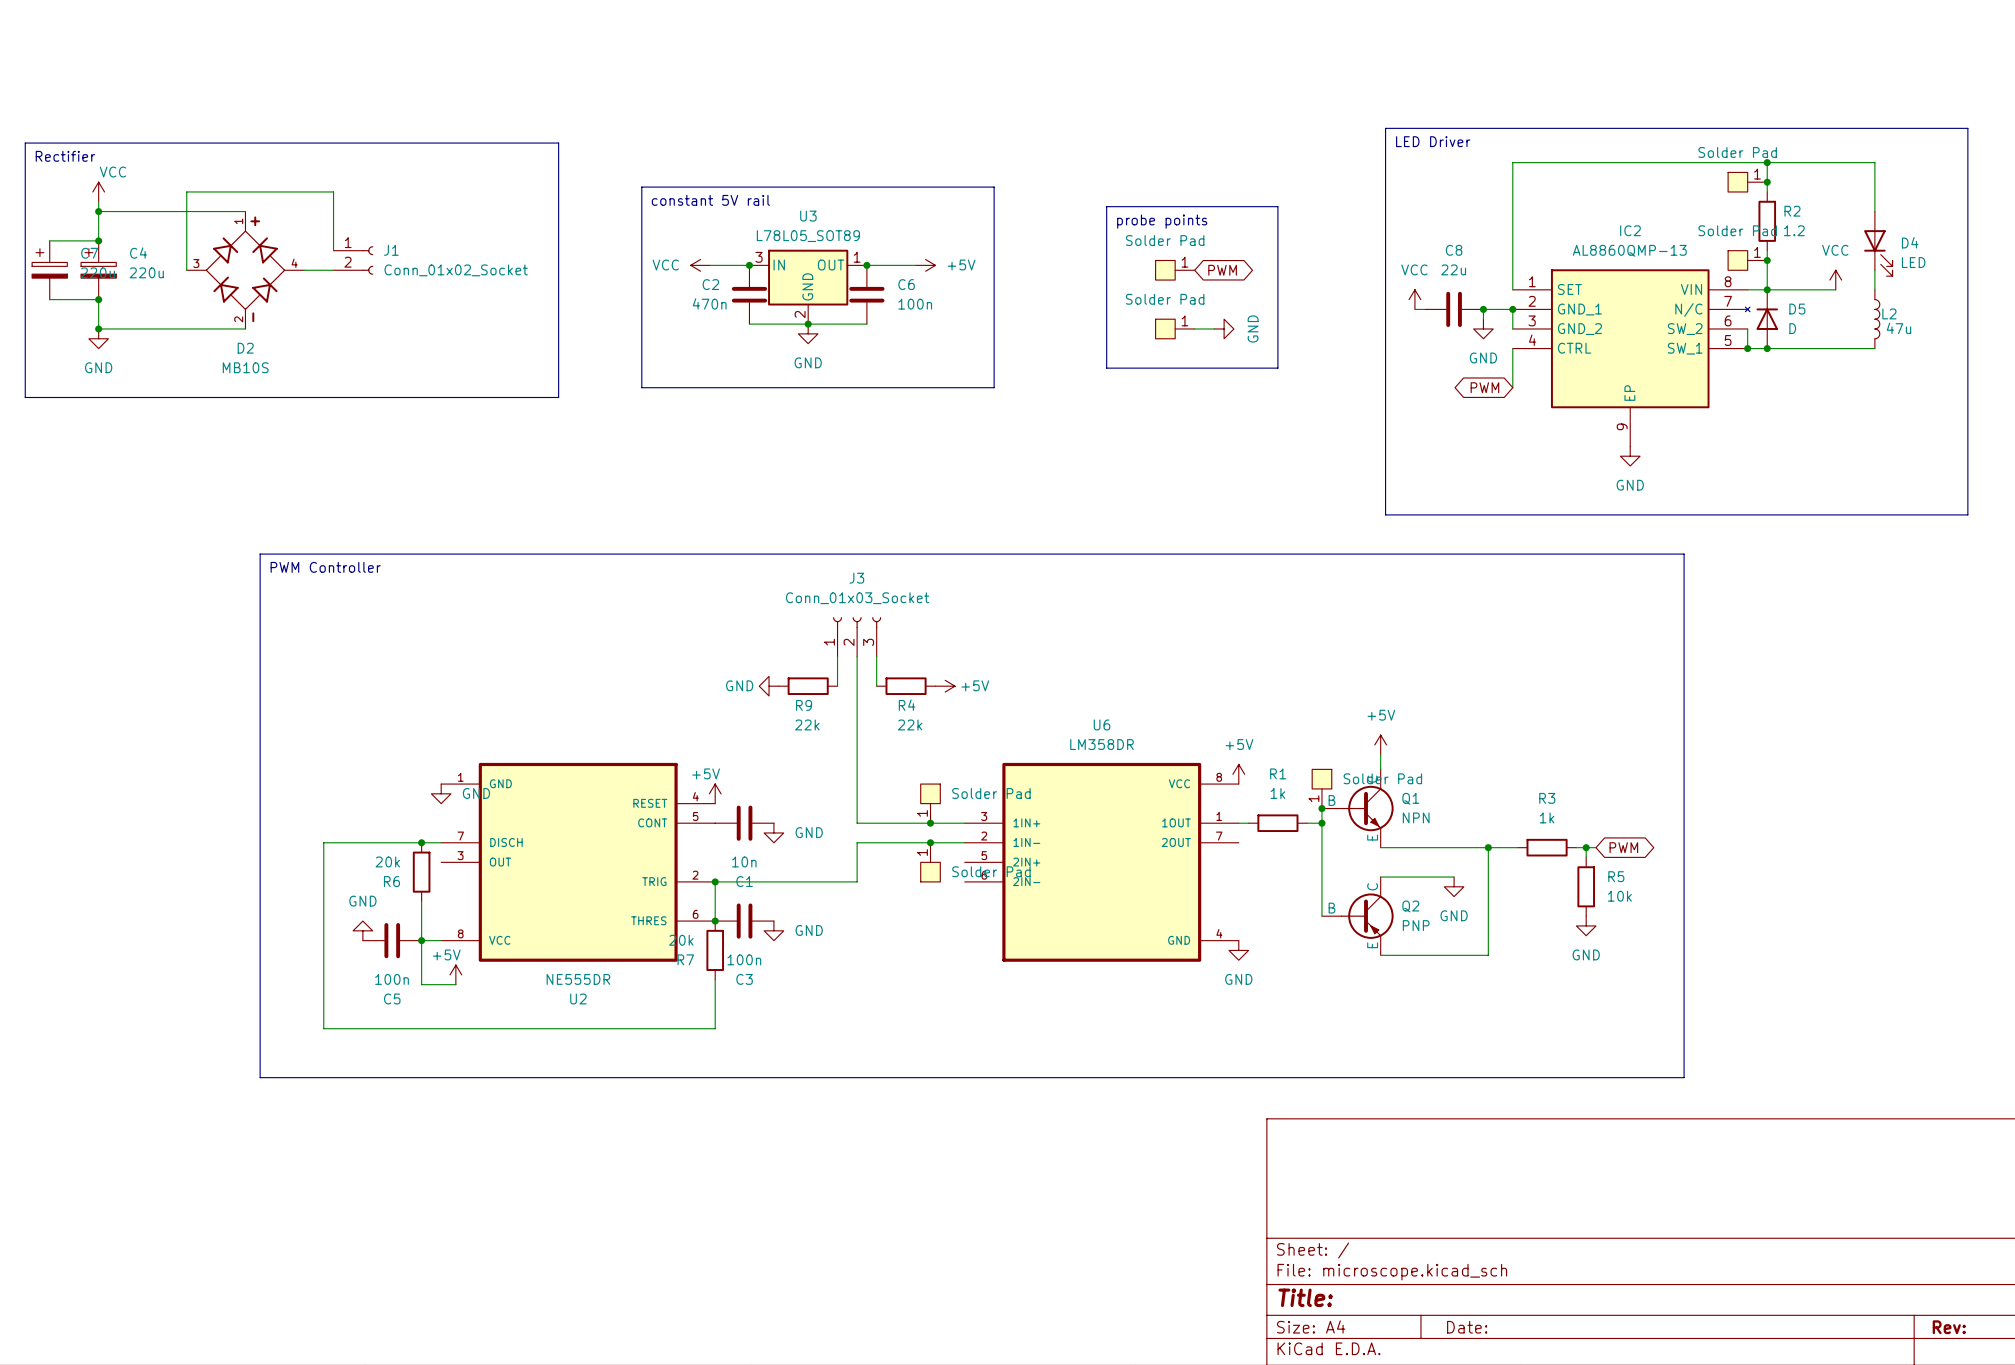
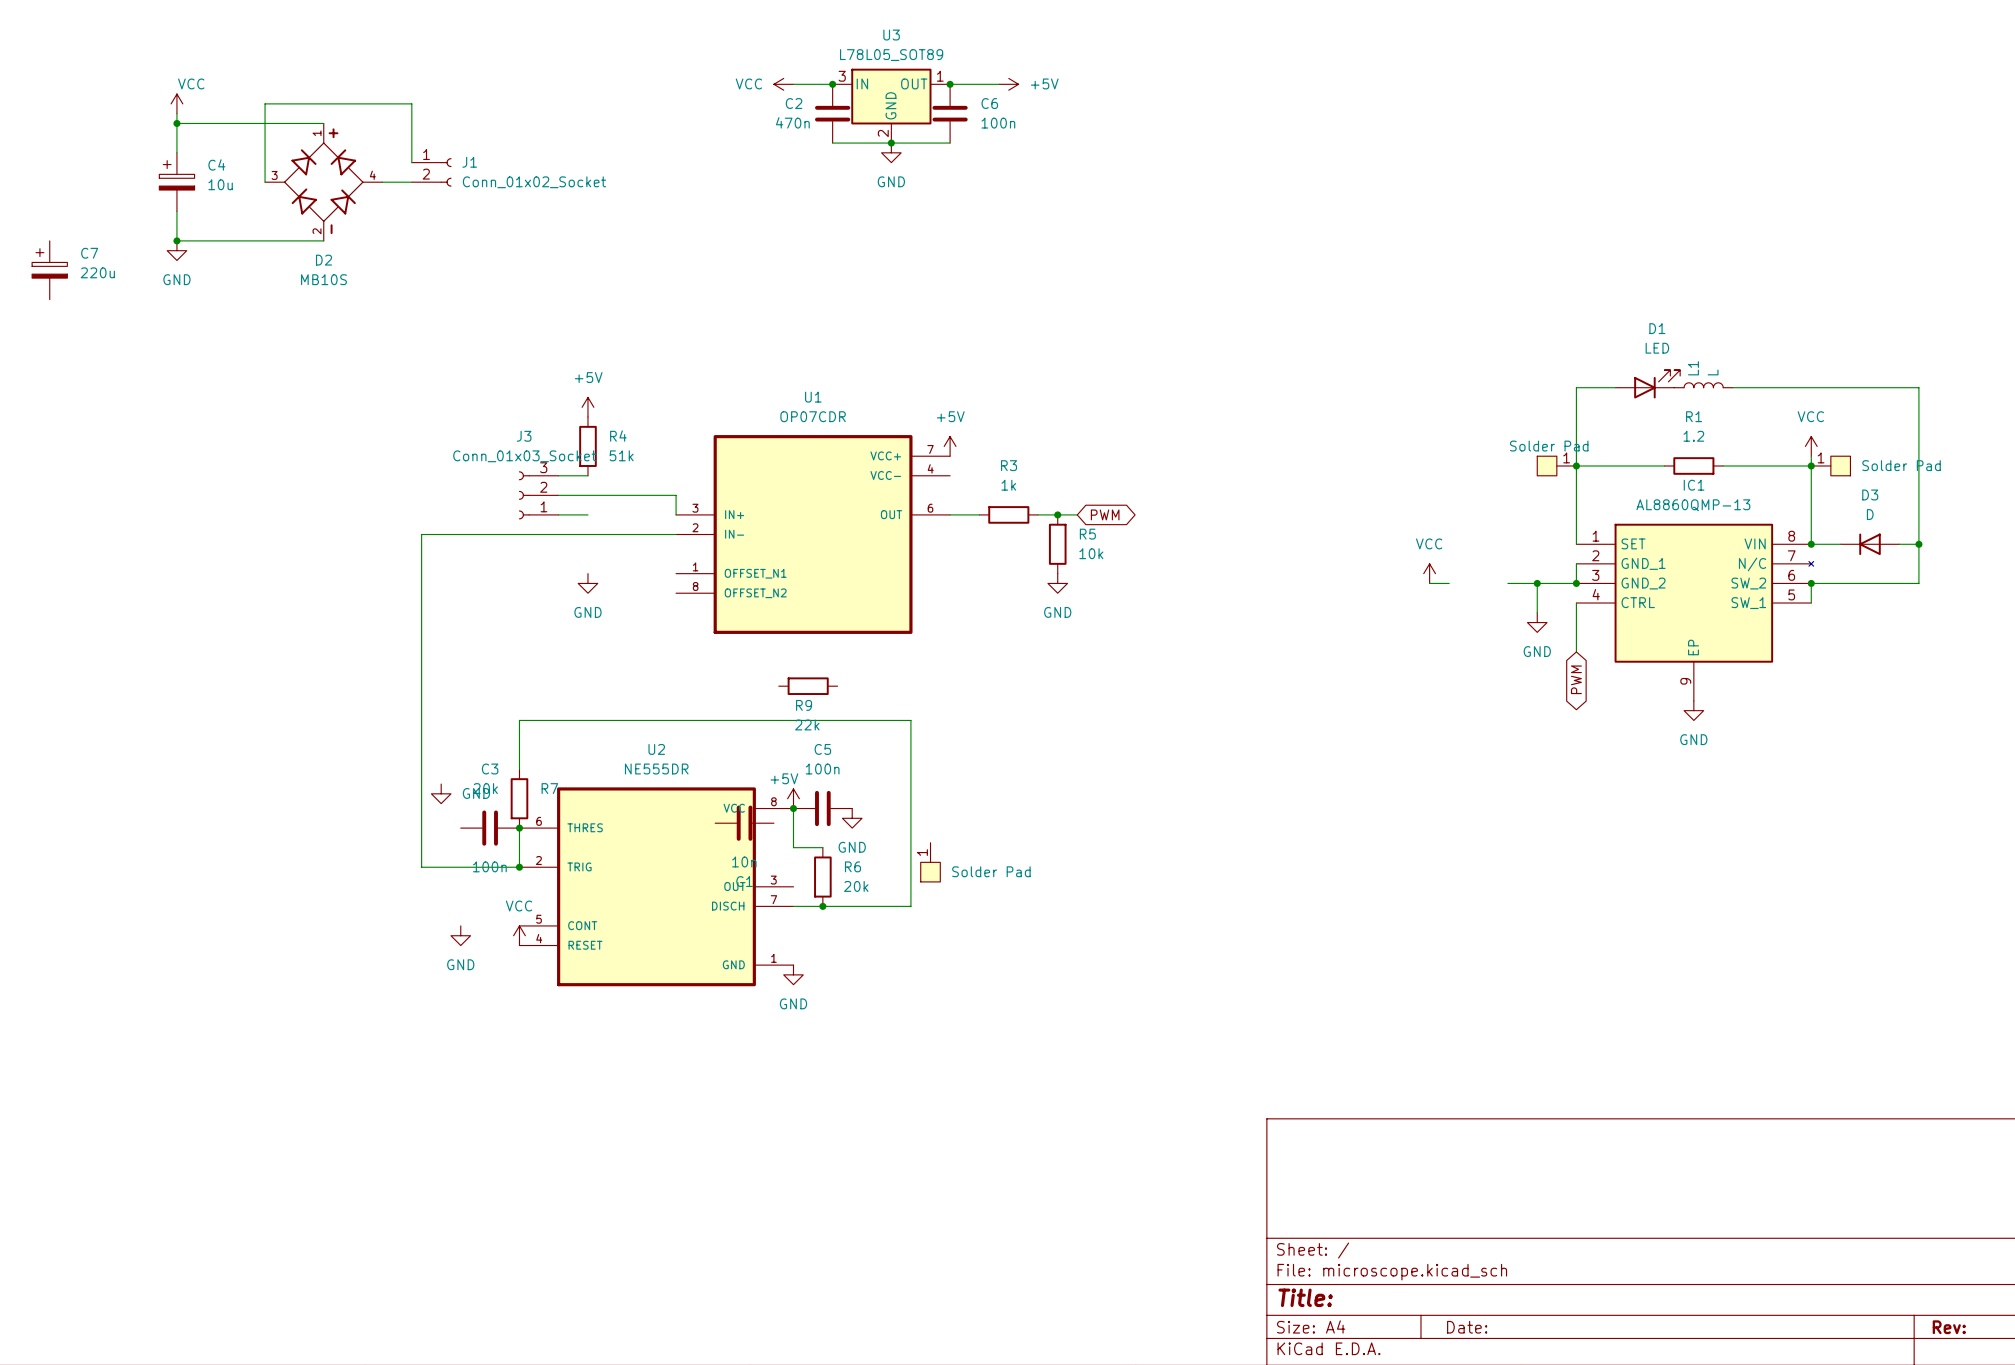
power symbol: none -> VCC (783, 84)
wire: none -> (793, 84) (832, 84)
junction: none -> (832, 84)
wire: none -> (950, 84) (999, 84)
junction: none -> (950, 84)
power symbol: none -> +5V (1008, 84)
wire: none -> (176, 113) (176, 152)
junction: none -> (176, 123)
line: (1385, 128) (1967, 128) (1967, 514) (1385, 514) (1385, 128) -> none
text: LED Driver (1433, 141) -> none
line: (25, 143) (558, 143) (558, 397) (25, 397) (25, 143) -> none
wire: none -> (832, 143) (950, 143)
junction: none -> (891, 143)
power symbol: none -> GND (891, 152)
text: Rectifier (65, 156) -> none
wire: (1767, 162) (1767, 191) -> none
junction: (1767, 162) -> none
part: Solder Pad (1747, 182) -> none
junction: (1767, 182) -> none
line: (641, 187) (994, 187) (994, 387) (641, 387) (641, 187) -> none
power symbol position: VCC (98, 191) -> VCC (176, 103)
text: constant 5V rail (710, 200) -> none
wire: (98, 201) (98, 240) (49, 240) -> none
line: (1106, 206) (1277, 206) (1277, 368) (1106, 368) (1106, 206) -> none
wire: (98, 211) (245, 211) -> (176, 123) (323, 123)
junction: (98, 211) -> none
wire: none -> (176, 211) (176, 240) (323, 240)
wire: (1874, 211) (1874, 162) (1512, 162) (1512, 289) -> none
text: probe points (1162, 221) -> none
R2: 1.2 (1767, 221) -> none
junction: (98, 240) -> none
junction: none -> (176, 240)
D4: LED (1878, 243) -> none
wire: (333, 250) (333, 191) (186, 191) (186, 270) -> (411, 162) (411, 103) (265, 103) (265, 182)
wire: (1767, 250) (1767, 289) -> none
J1 position: (353, 260) -> (431, 172)
part: Solder Pad (1747, 260) -> none
junction: (1767, 260) -> none
power symbol: VCC (700, 265) -> none
wire: (710, 265) (749, 265) -> none
junction: (749, 265) -> none
wire: (866, 265) (915, 265) -> none
junction: (866, 265) -> none
power symbol: +5V (925, 265) -> none
C4 position: (98, 270) -> (176, 182)
D2 position: (245, 270) -> (323, 182)
wire: (304, 270) (333, 270) -> (382, 182) (411, 182)
part: Solder Pad (1175, 270) -> none
global label: PWM (1222, 270) -> none
wire: (1874, 270) (1874, 289) -> none
C4 value: 220u (146, 272) -> 10u (220, 184)
power symbol position: VCC (1835, 280) -> VCC (1811, 446)
U3 position: (808, 286) -> (891, 105)
wire: (1747, 289) (1835, 289) -> (1723, 465) (1811, 465)
junction: (1767, 289) -> none
C2 position: (749, 294) -> (832, 113)
C6 position: (866, 294) -> (950, 113)
wire: (49, 299) (98, 299) (98, 328) (245, 328) -> none
junction: (98, 299) -> none
power symbol: VCC (1414, 299) -> none
wire: (1414, 309) (1424, 309) -> none
C8: 22u (1454, 309) -> none
junction: (1483, 309) -> none
junction: (1512, 309) -> none
wire: (1483, 319) (1483, 309) (1512, 309) (1512, 328) -> none
D5: D (1767, 319) -> none
L2: 47u (1877, 319) -> none
wire: (749, 324) (866, 324) -> none
junction: (808, 324) -> none
junction: (98, 328) -> none
part: Solder Pad (1175, 328) -> none
wire: (1194, 328) (1214, 328) -> none
power symbol: GND (1224, 328) -> none
power symbol: GND (1483, 328) -> none
wire: (1747, 328) (1747, 348) (1874, 348) -> none
power symbol: GND (808, 333) -> none
power symbol position: GND (98, 338) -> GND (176, 250)
wire: (1512, 348) (1512, 387) -> none
junction: (1747, 348) -> none
junction: (1767, 348) -> none
IC2: AL8860QMP-13 (1631, 357) -> none
D1: none -> LED (1647, 384)
L1: none -> L (1703, 385)
global label: PWM (1484, 387) -> none
wire: none -> (1615, 387) (1576, 387) (1576, 544)
wire: none -> (1732, 387) (1918, 387) (1918, 583) (1811, 583) (1811, 603)
power symbol: none -> +5V (587, 407)
power symbol: none -> +5V (950, 446)
power symbol: GND (1630, 456) -> none
wire: none -> (1811, 456) (1811, 544) (1840, 544)
part: none -> Solder Pad (1556, 465)
wire: none -> (1576, 465) (1664, 465)
junction: none -> (1576, 465)
junction: none -> (1811, 465)
part: none -> Solder Pad (1830, 465)
wire: none -> (558, 475) (587, 475)
wire: none -> (558, 495) (676, 495) (676, 514)
wire: none -> (558, 514) (587, 514)
wire: none -> (950, 514) (979, 514)
wire: none -> (1038, 514) (1077, 514)
junction: none -> (1057, 514)
global label: none -> PWM (1105, 514)
wire: none -> (676, 534) (421, 534) (421, 867) (519, 867) (519, 828)
U1: none -> OP07CDR (813, 534)
junction: none -> (1811, 544)
D3: none -> D (1870, 544)
wire: none -> (1899, 544) (1918, 544)
junction: none -> (1918, 544)
line: (260, 554) (1684, 554) (1684, 1077) (260, 1077) (260, 554) -> none
wire: none -> (1576, 563) (1576, 583) (1507, 583)
text: PWM Controller (325, 567) -> none
power symbol: none -> VCC (1429, 573)
power symbol: none -> GND (587, 583)
power symbol: none -> GND (1057, 583)
wire: none -> (1429, 583) (1449, 583)
wire: none -> (1537, 583) (1537, 612)
junction: none -> (1537, 583)
junction: none -> (1576, 583)
junction: none -> (1811, 583)
wire: none -> (1576, 603) (1576, 651)
IC1: none -> AL8860QMP-13 (1695, 612)
J3 rotation: 0° (857, 622) -> 90° counterclockwise (524, 495)
power symbol: none -> GND (1537, 622)
J3 position: (857, 636) -> (538, 495)
wire: (837, 656) (837, 686) -> none
wire: (857, 656) (857, 823) (964, 823) -> none
wire: (876, 656) (876, 686) -> none
global label: none -> PWM (1576, 679)
power symbol: GND (769, 686) -> none
R4 rotation: 0° (906, 686) -> 90° clockwise (587, 446)
R4 position: (906, 686) -> (587, 446)
power symbol: +5V (945, 686) -> none
R4 name position: R4 (907, 705) -> R4 (618, 436)
power symbol: none -> GND (1693, 710)
R4 value: 22k (910, 724) -> 51k (621, 455)
power symbol: +5V (1380, 744) -> none
wire: (1380, 754) (1380, 769) -> none
wire: none -> (519, 769) (519, 720) (910, 720) (910, 906) (793, 906)
power symbol: +5V (1238, 774) -> none
part: Solder Pad (1321, 788) -> none
power symbol position: +5V (715, 793) -> +5V (793, 798)
R1 value: 1k (1277, 793) -> 1.2 (1693, 436)
part: Solder Pad (930, 803) -> none
wire: none -> (793, 808) (793, 847) (822, 847)
junction: none -> (793, 808)
wire: (1321, 808) (1321, 916) -> none
junction: (1321, 808) -> none
Q1: NPN (1357, 808) -> none
power symbol: none -> GND (852, 818)
junction: (930, 823) -> none
wire: (1238, 823) (1248, 823) -> none
R1 position: (1277, 823) -> (1693, 465)
wire: (1307, 823) (1321, 823) -> none
junction: (1321, 823) -> none
junction: none -> (519, 828)
power symbol: GND (773, 832) -> none
junction: (421, 842) -> none
wire: (441, 842) (323, 842) (323, 1028) (715, 1028) (715, 979) -> none
junction: (930, 842) -> none
wire: (964, 842) (857, 842) (857, 881) (715, 881) (715, 921) -> none
wire: (1380, 847) (1517, 847) -> none
wire: (1488, 847) (1488, 955) (1380, 955) -> none
junction: (1488, 847) -> none
R3 position: (1547, 847) -> (1008, 514)
wire: (1576, 847) (1595, 847) -> none
wire: (1586, 847) (1586, 857) -> none
junction: (1586, 847) -> none
global label: PWM (1623, 847) -> none
R6 value position: 20k (387, 861) -> 20k (856, 886)
U2 rotation: 0° (578, 862) -> 180° (656, 886)
U6: LM358DR (1101, 862) -> none
junction: none -> (519, 867)
R6 position: (421, 872) -> (822, 877)
wire: (1380, 877) (1454, 877) -> none
R6 name position: R6 (391, 881) -> R6 (852, 866)
junction: (715, 881) -> none
power symbol: GND (1454, 886) -> none
R5 position: (1586, 886) -> (1057, 544)
wire: (421, 901) (421, 984) (455, 984) -> none
junction: none -> (822, 906)
Q2: PNP (1357, 916) -> none
junction: (715, 921) -> none
C3 position: (744, 921) -> (490, 828)
power symbol: GND (1586, 925) -> none
power symbol rotation: 0° (362, 930) -> 180° (460, 935)
power symbol position: GND (362, 930) -> GND (460, 935)
power symbol position: GND (773, 930) -> GND (793, 974)
power symbol text position: GND (809, 930) -> GND (793, 1003)
power symbol: none -> VCC (519, 935)
C5 position: (392, 940) -> (822, 808)
wire: (421, 940) (441, 940) -> none
junction: (421, 940) -> none
R7 position: (715, 950) -> (519, 798)
power symbol: GND (1238, 950) -> none
R7 name position: R7 (685, 959) -> R7 (549, 788)
power symbol: +5V (455, 974) -> none
C5 value position: 100n (392, 979) -> 100n (822, 769)
C3 name position: C3 (744, 979) -> C3 (490, 769)
C5 name position: C5 (392, 998) -> C5 (822, 749)

